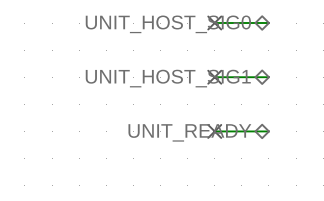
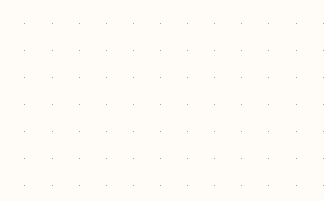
wire: (214, 23) (268, 23) -> none
no-connect mark: (214, 23) -> none
hierarchical label: UNIT_HOST_SIG0 (168, 24) -> none
wire: (214, 77) (268, 77) -> none
no-connect mark: (214, 77) -> none
hierarchical label: UNIT_HOST_SIG1 (168, 78) -> none
wire: (214, 131) (268, 131) -> none
no-connect mark: (214, 131) -> none
hierarchical label: UNIT_READY (189, 132) -> none

